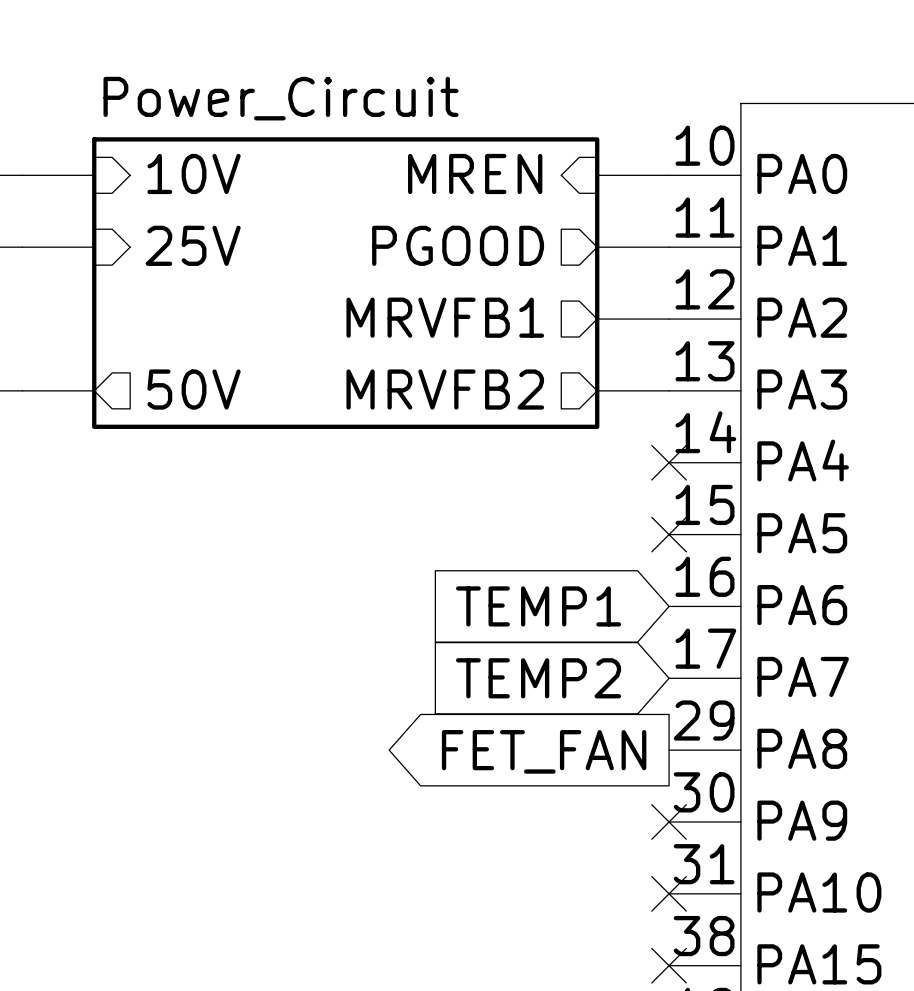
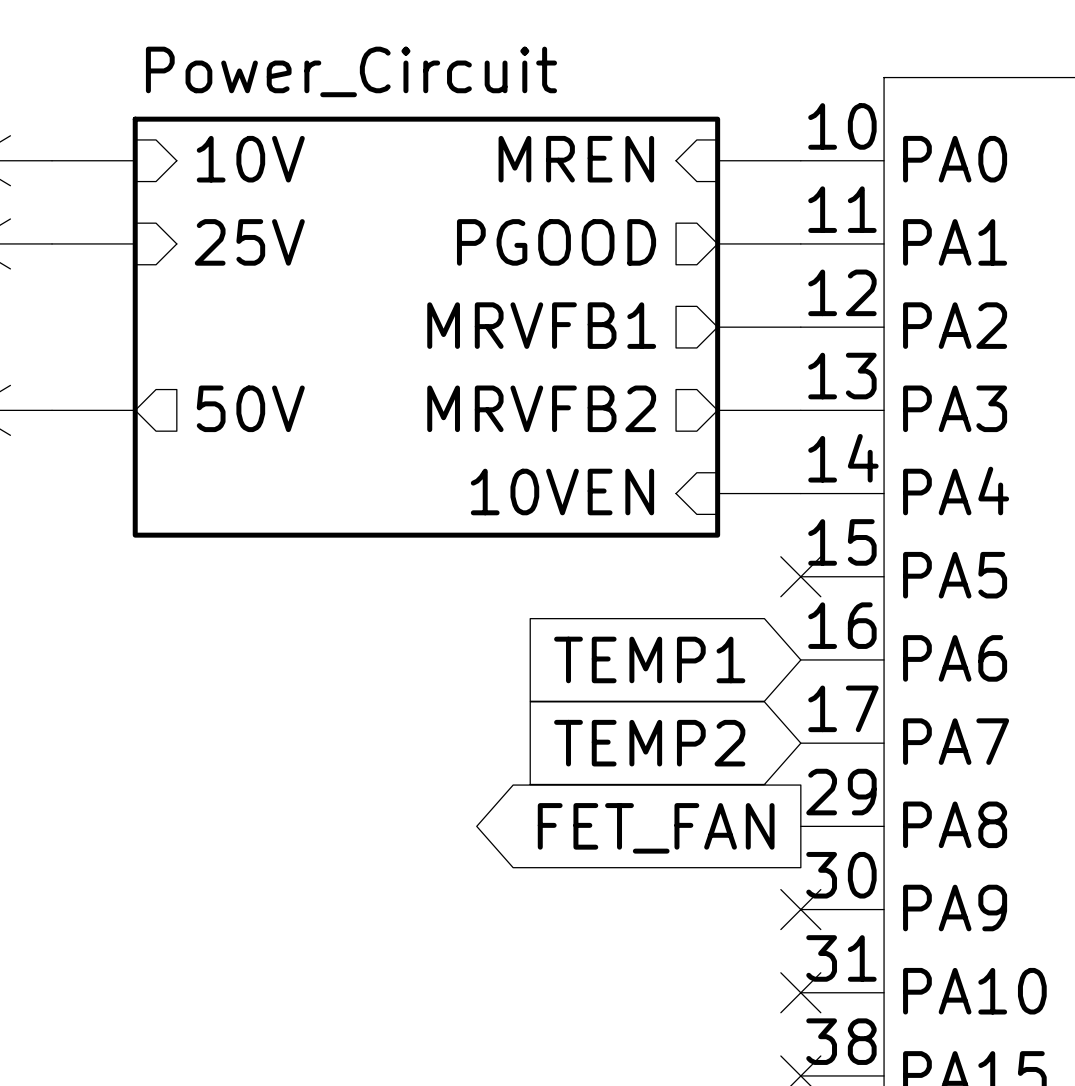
sheet Power_Circuit: (345, 283) -> none
sheet Power_Circuit: none -> (426, 327)
sheet pin: none -> 10VEN (562, 492)
wire: none -> (717, 493) (800, 493)
no-connect mark: (669, 462) -> none

